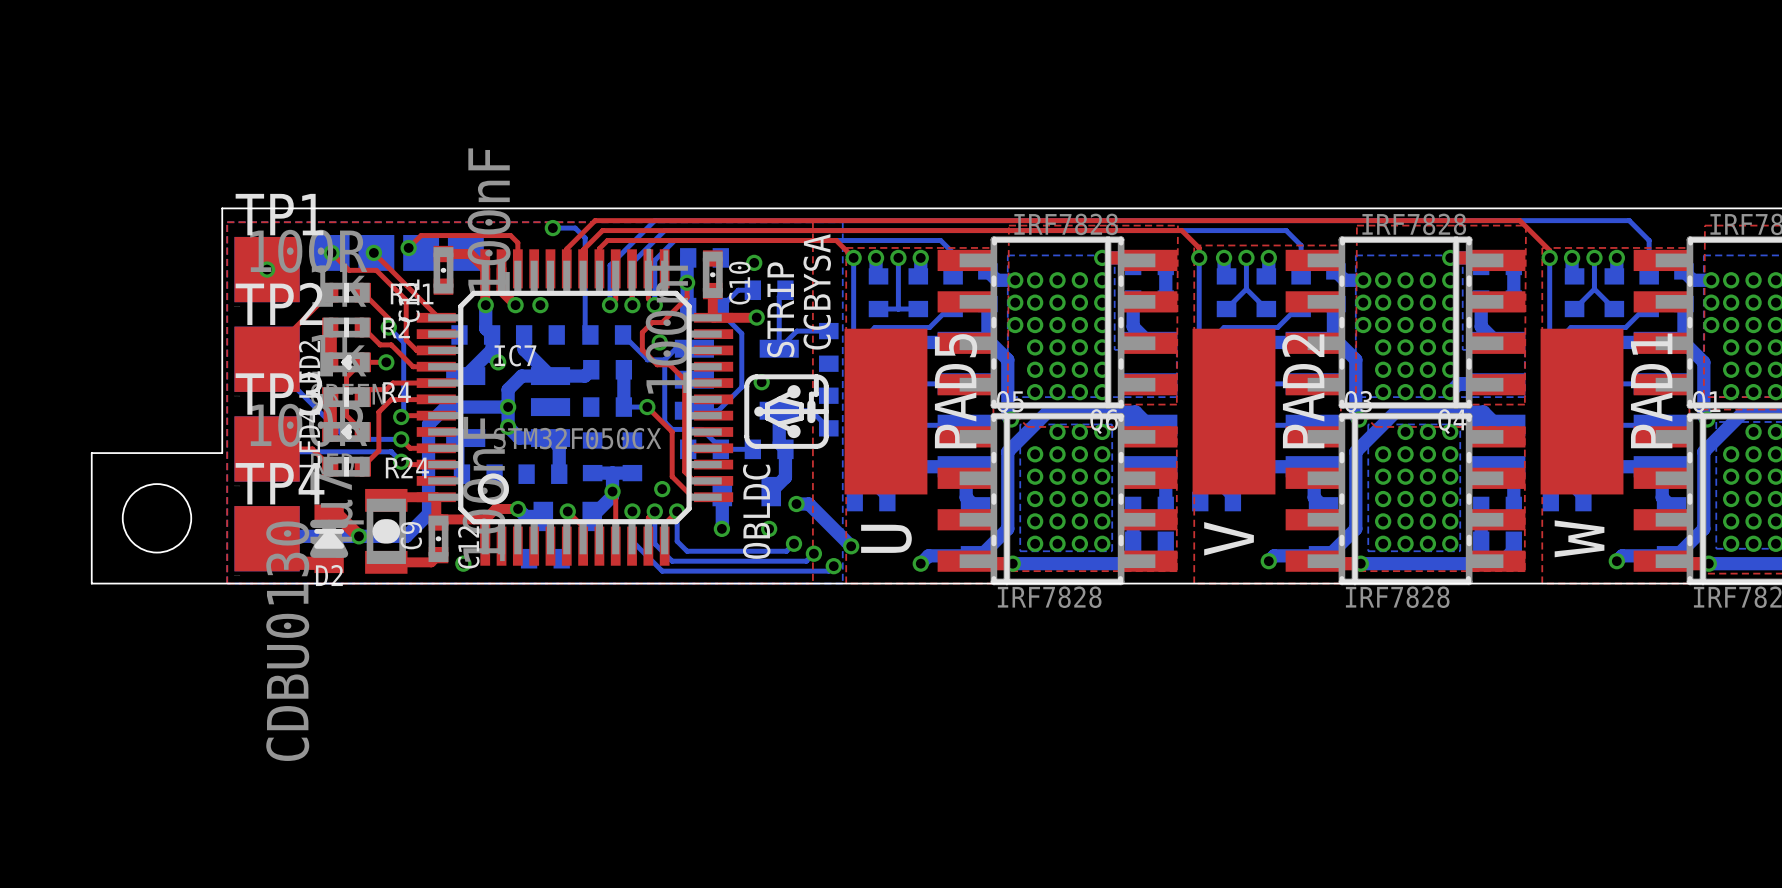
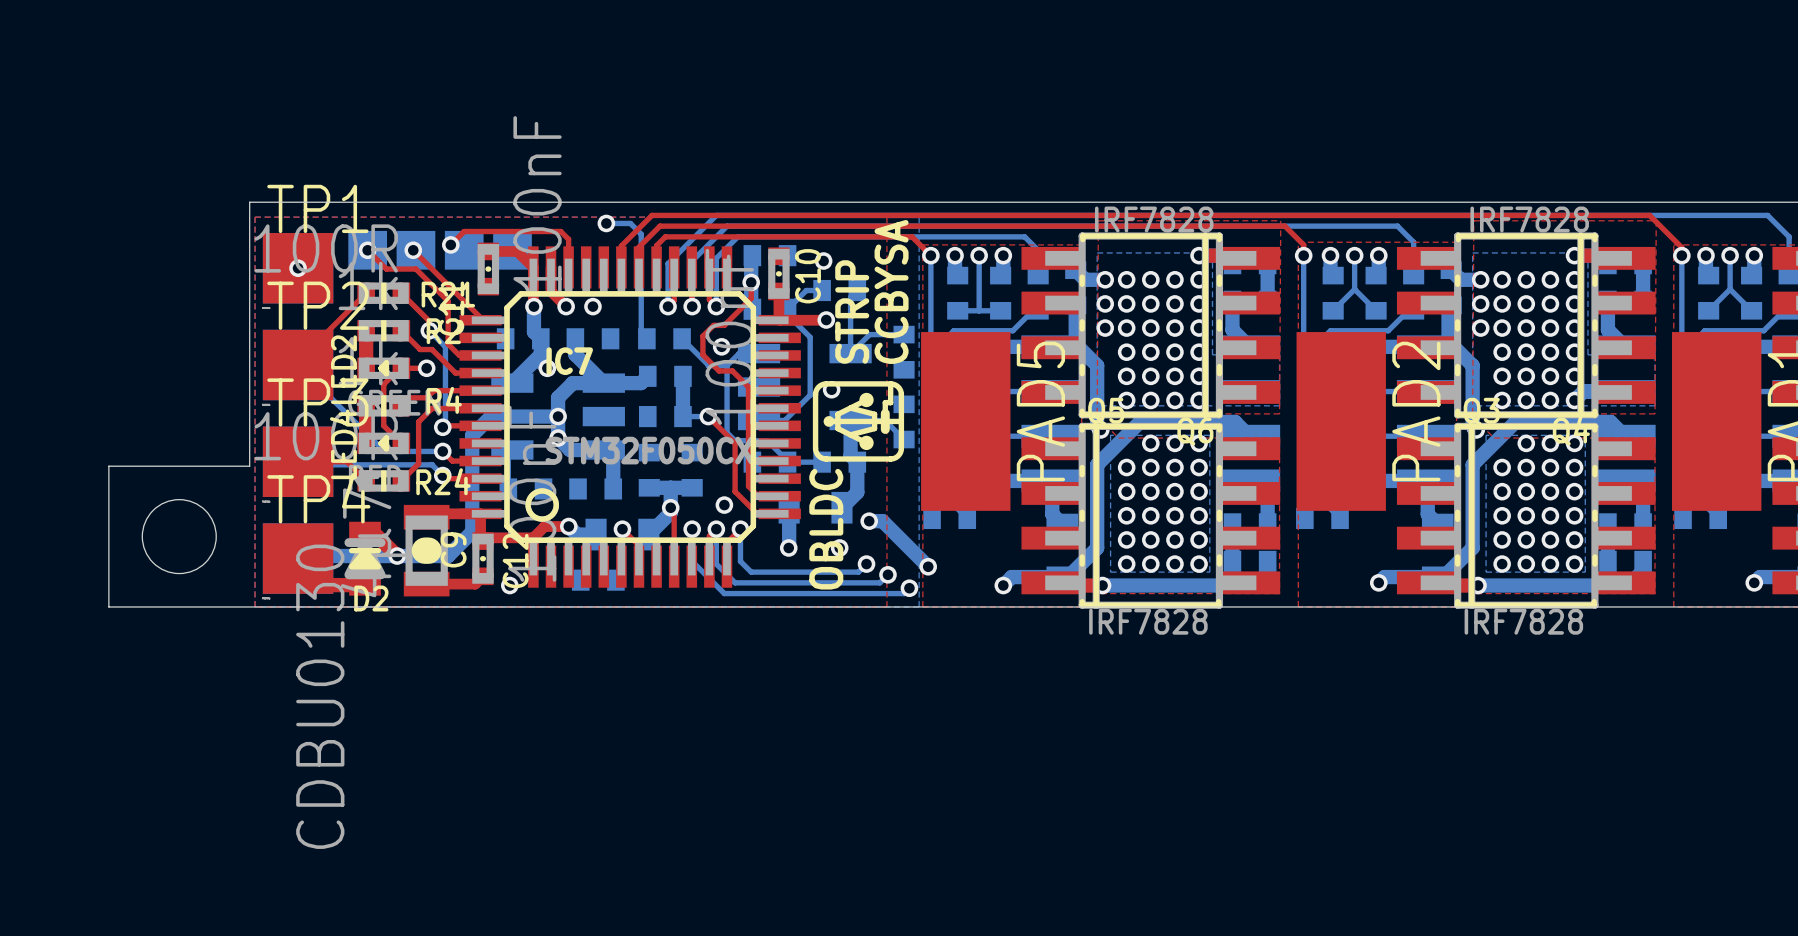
text: U (886, 538) -> none
text: V (1229, 538) -> none
text: W (1579, 538) -> none

